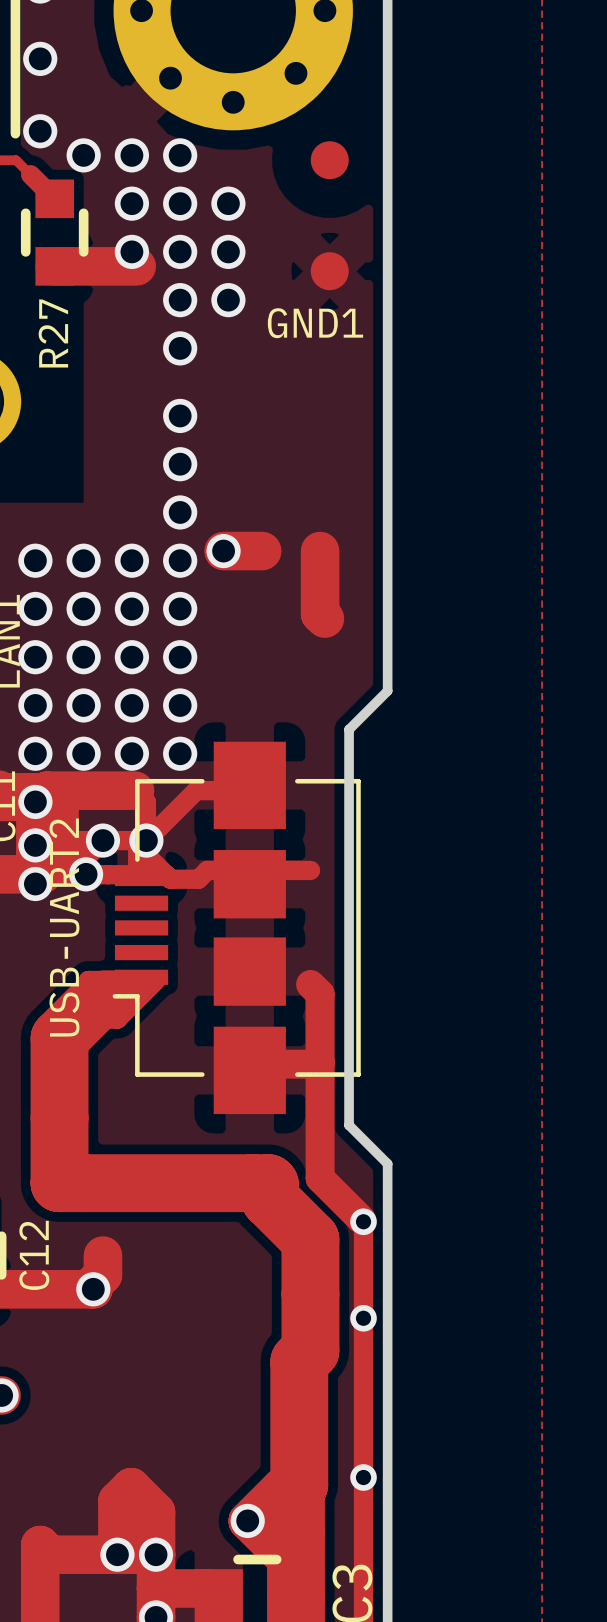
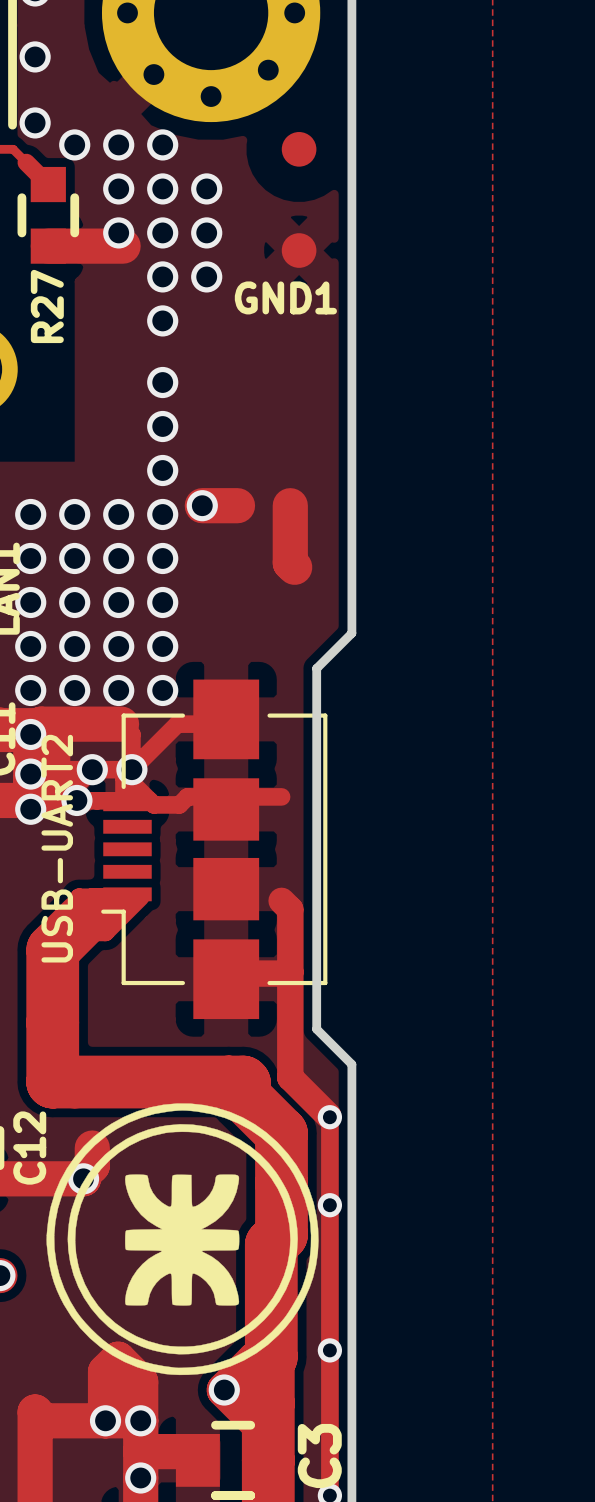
drawing: none -> [46, 1103, 319, 1376]

